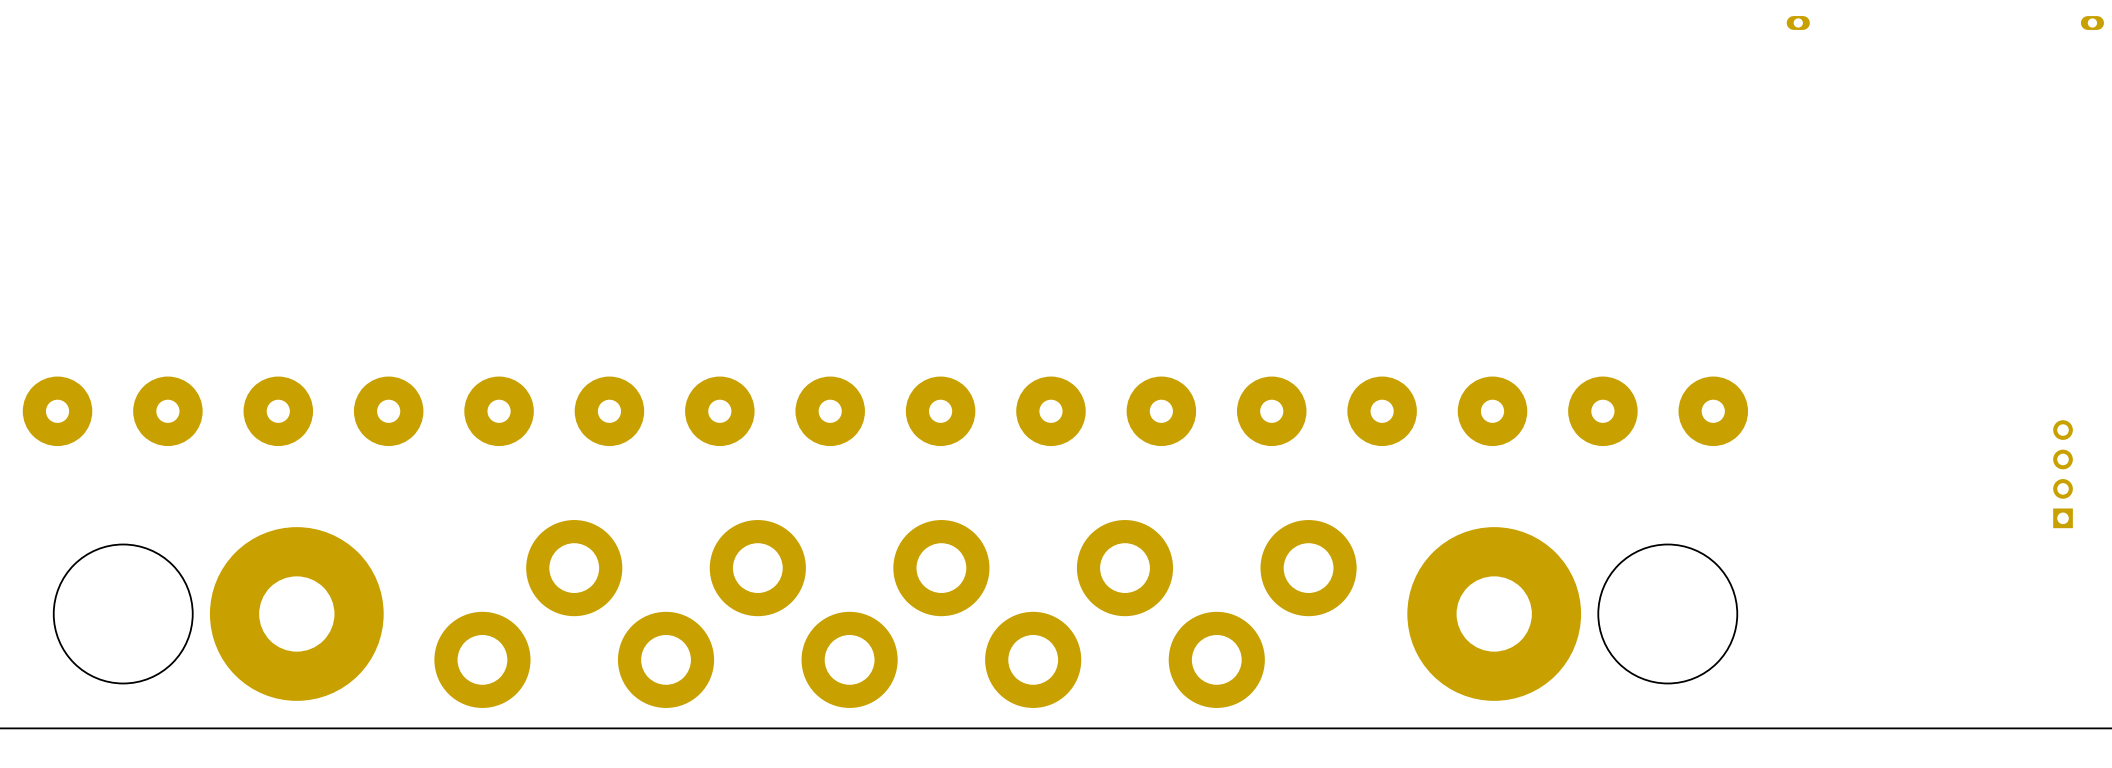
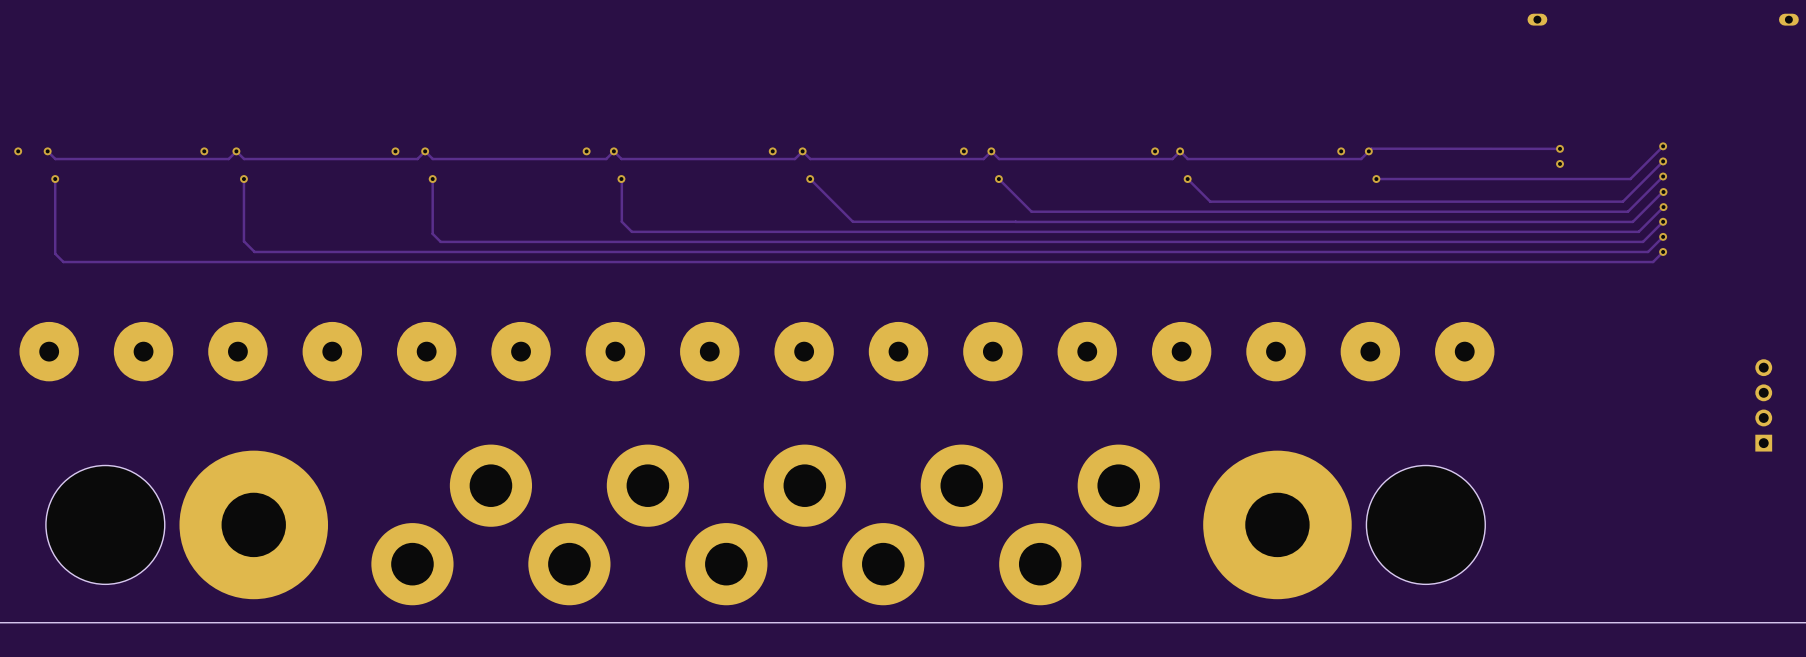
track: none -> (1663, 146) (1630, 179) (1376, 179)
via: none -> (1663, 146)
track: none -> (1560, 148) (1371, 148) (1361, 159) (1187, 159) (1180, 151) (1172, 159) (999, 159) (991, 151) (983, 159) (810, 159) (802, 151) (794, 159) (621, 159) (613, 151) (606, 159) (432, 159) (425, 151) (417, 159) (244, 159) (236, 151) (228, 159) (55, 159) (47, 151)
via: none -> (1560, 148)
via: none -> (18, 151)
via: none -> (47, 151)
via: none -> (204, 151)
via: none -> (236, 151)
via: none -> (395, 151)
via: none -> (425, 151)
via: none -> (586, 151)
via: none -> (613, 151)
via: none -> (772, 151)
via: none -> (802, 151)
via: none -> (963, 151)
via: none -> (991, 151)
via: none -> (1155, 151)
via: none -> (1180, 151)
via: none -> (1341, 151)
via: none -> (1368, 151)
track: none -> (1663, 161) (1622, 201) (1210, 201) (1187, 179)
via: none -> (1663, 161)
via: none -> (1560, 163)
track: none -> (1663, 176) (1627, 211) (1031, 211) (998, 179)
via: none -> (1663, 176)
track: none -> (55, 179) (55, 253) (63, 262) (1653, 262) (1663, 251)
via: none -> (55, 179)
track: none -> (243, 179) (243, 241) (254, 251) (1648, 251) (1663, 236)
via: none -> (243, 179)
track: none -> (432, 179) (432, 233) (440, 241) (1643, 241) (1663, 221)
via: none -> (432, 179)
track: none -> (621, 179) (621, 221) (631, 231) (1638, 231) (1663, 207)
via: none -> (621, 179)
track: none -> (810, 179) (852, 221) (1015, 221)
via: none -> (810, 179)
via: none -> (998, 179)
via: none -> (1187, 179)
via: none -> (1376, 179)
track: none -> (1663, 192) (1632, 221) (1015, 221)
via: none -> (1663, 192)
via: none -> (1663, 207)
via: none -> (1663, 221)
via: none -> (1663, 236)
via: none -> (1663, 251)

